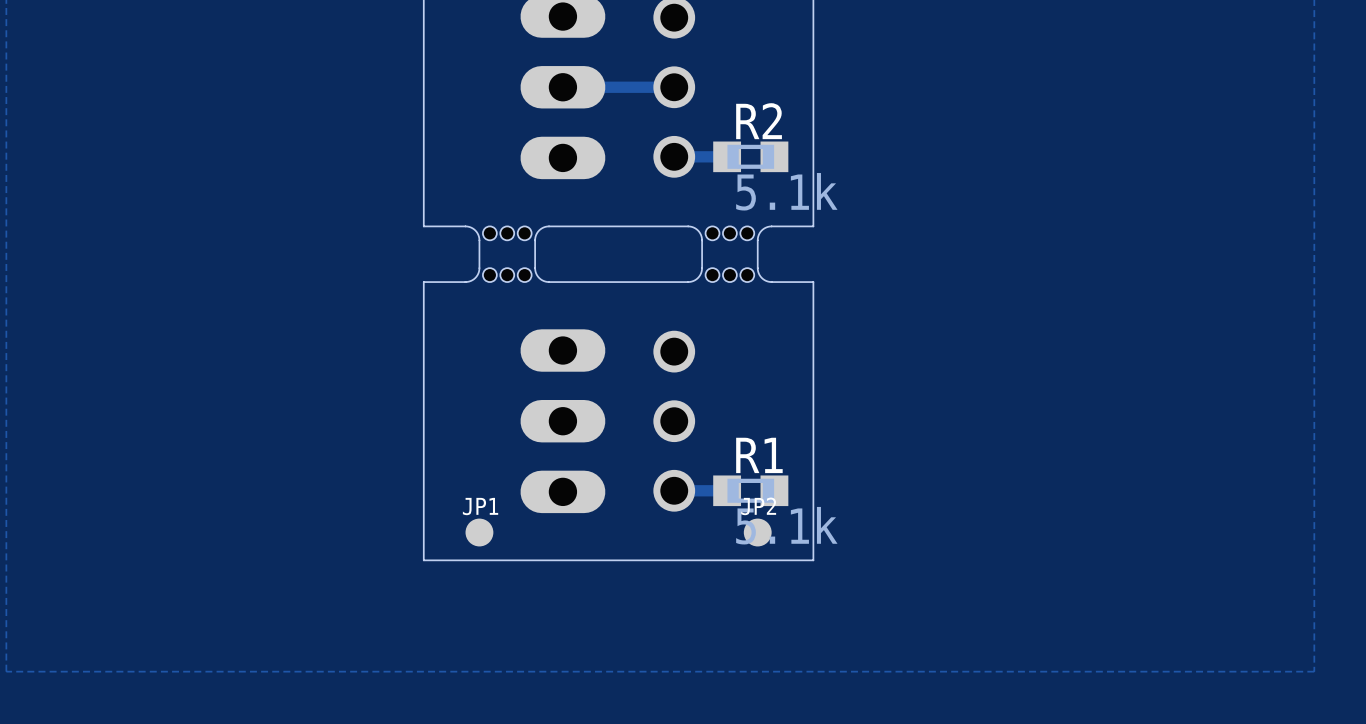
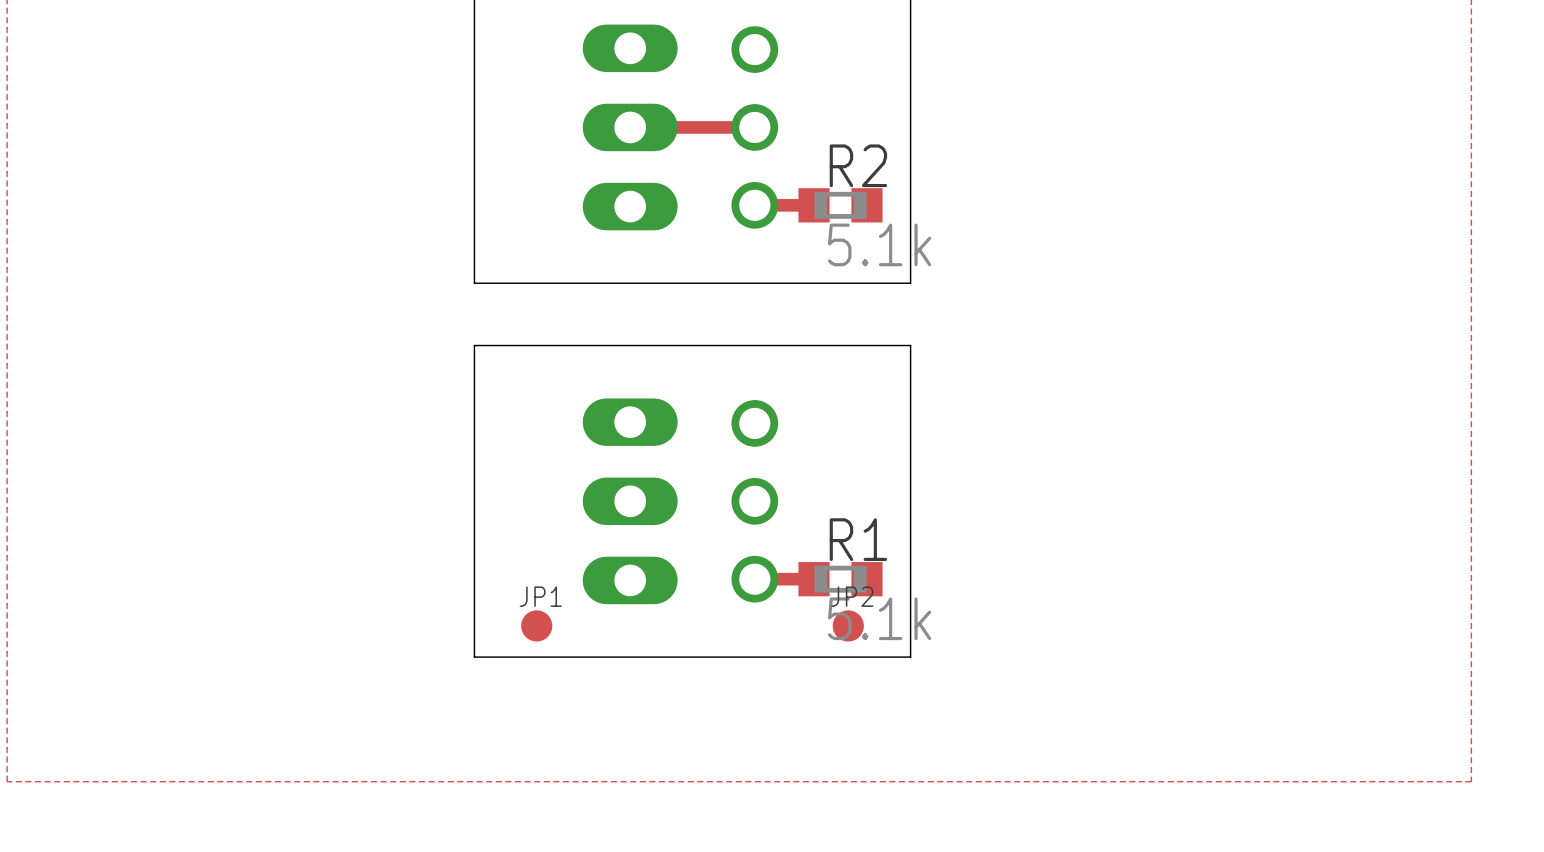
board edge: (465, 226) (475, 230) (479, 240) (478, 271) (474, 279) (465, 282) -> (521, 283) (614, 283)
board edge: (549, 226) (539, 230) (535, 240) (535, 271) (540, 279) (549, 282) -> (521, 345) (614, 345)
board edge: (688, 226) (698, 230) (702, 240) (701, 271) (696, 279) (688, 282) -> (770, 283) (863, 283)
board edge: (771, 226) (761, 230) (757, 240) (758, 271) (763, 279) (771, 282) -> (770, 345) (863, 345)
hole: (489, 233) -> none
hole: (507, 233) -> none
hole: (524, 233) -> none
hole: (712, 233) -> none
hole: (729, 233) -> none
hole: (747, 233) -> none
hole: (489, 275) -> none
hole: (507, 275) -> none
hole: (524, 275) -> none
hole: (712, 275) -> none
hole: (729, 275) -> none
hole: (747, 275) -> none

